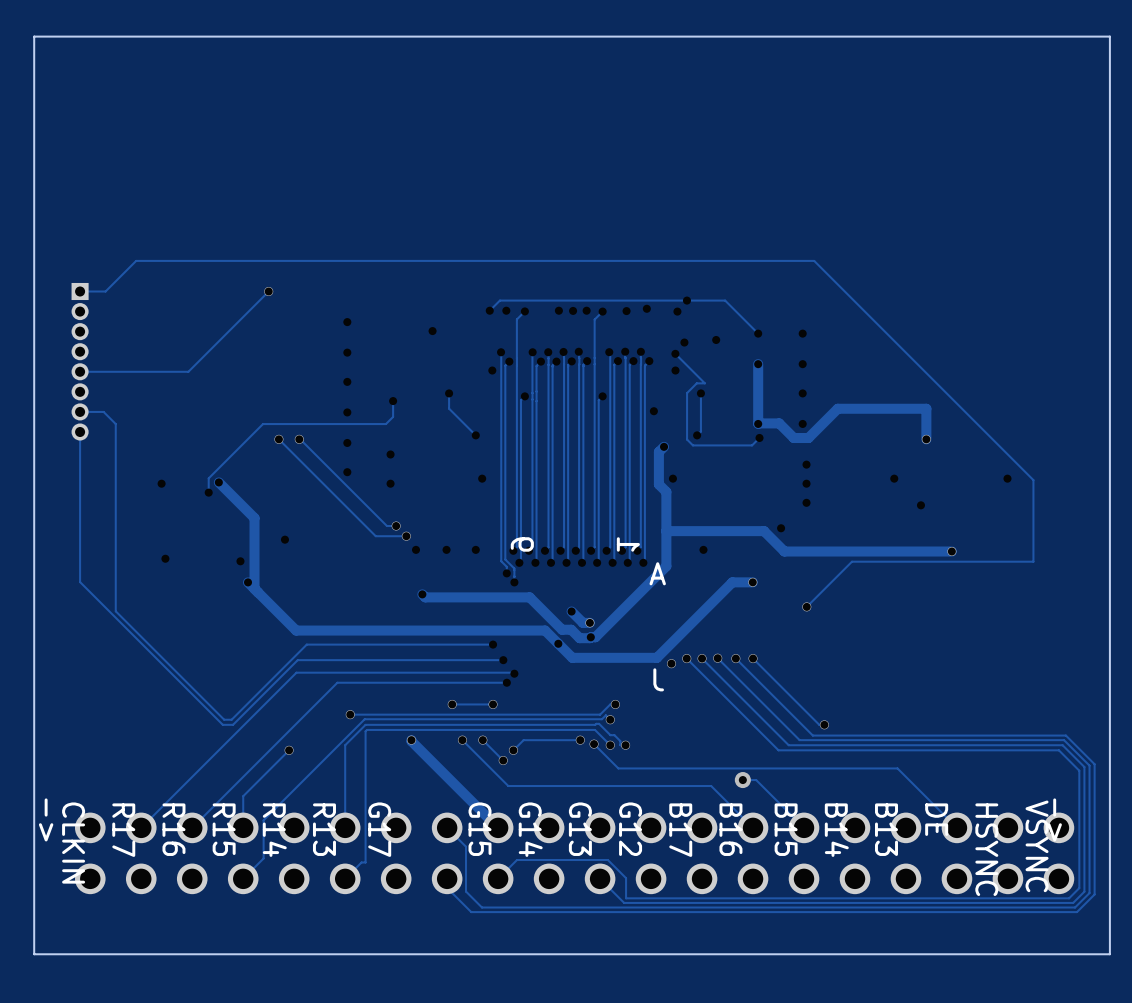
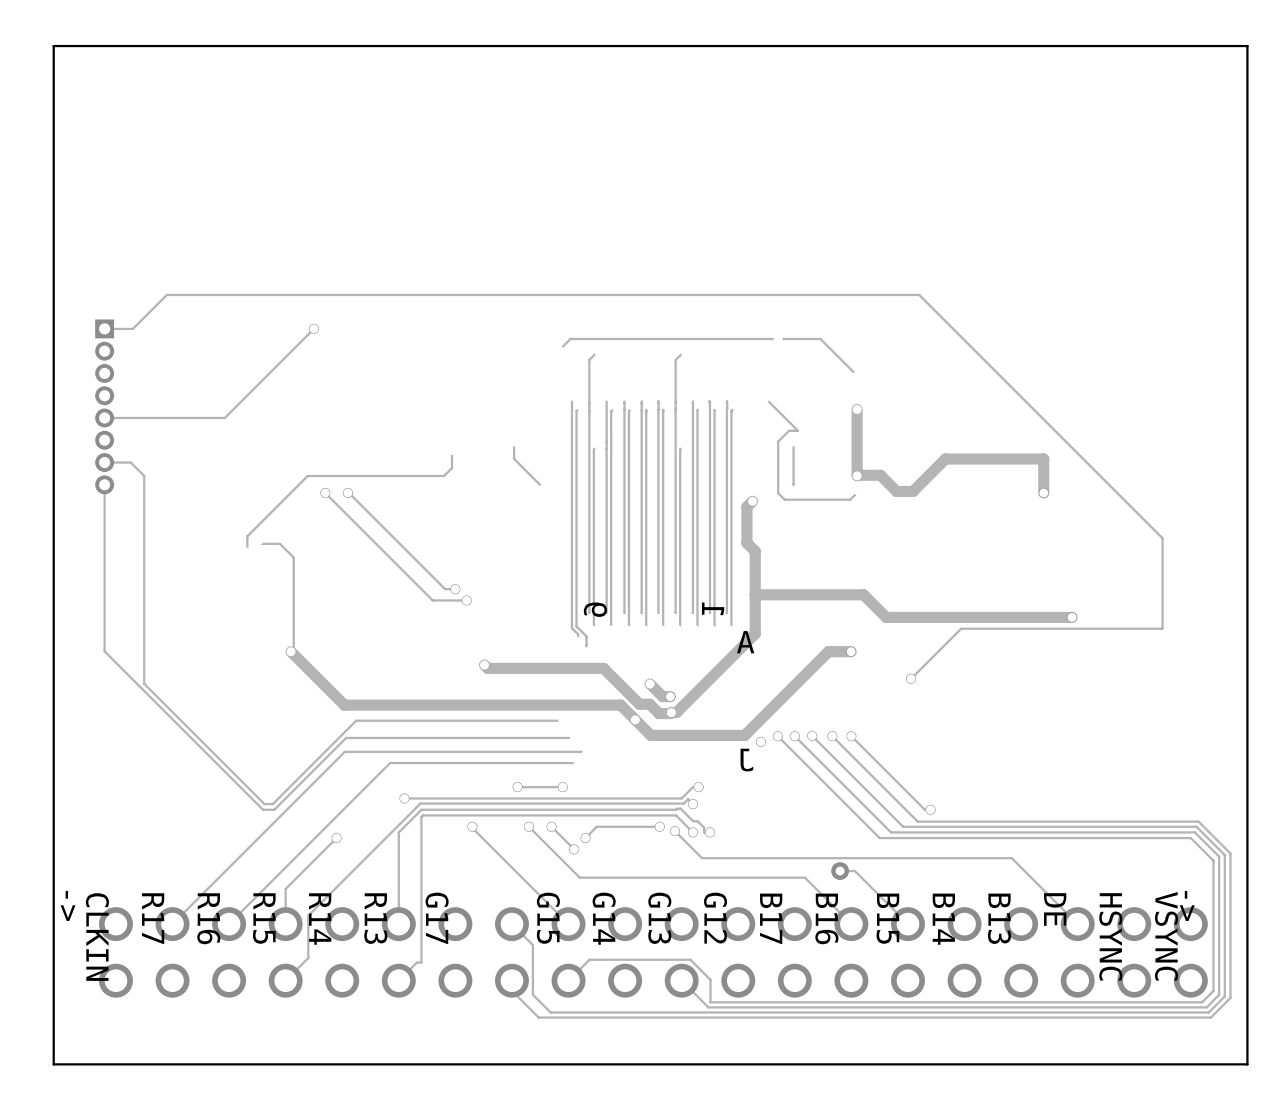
track: (218, 482) (254, 518) (254, 588) -> none
track: none -> (261, 543) (280, 543) (293, 557) (293, 648)
track width: thick (411, 740) (498, 827) -> thin (472, 826) (568, 924)

